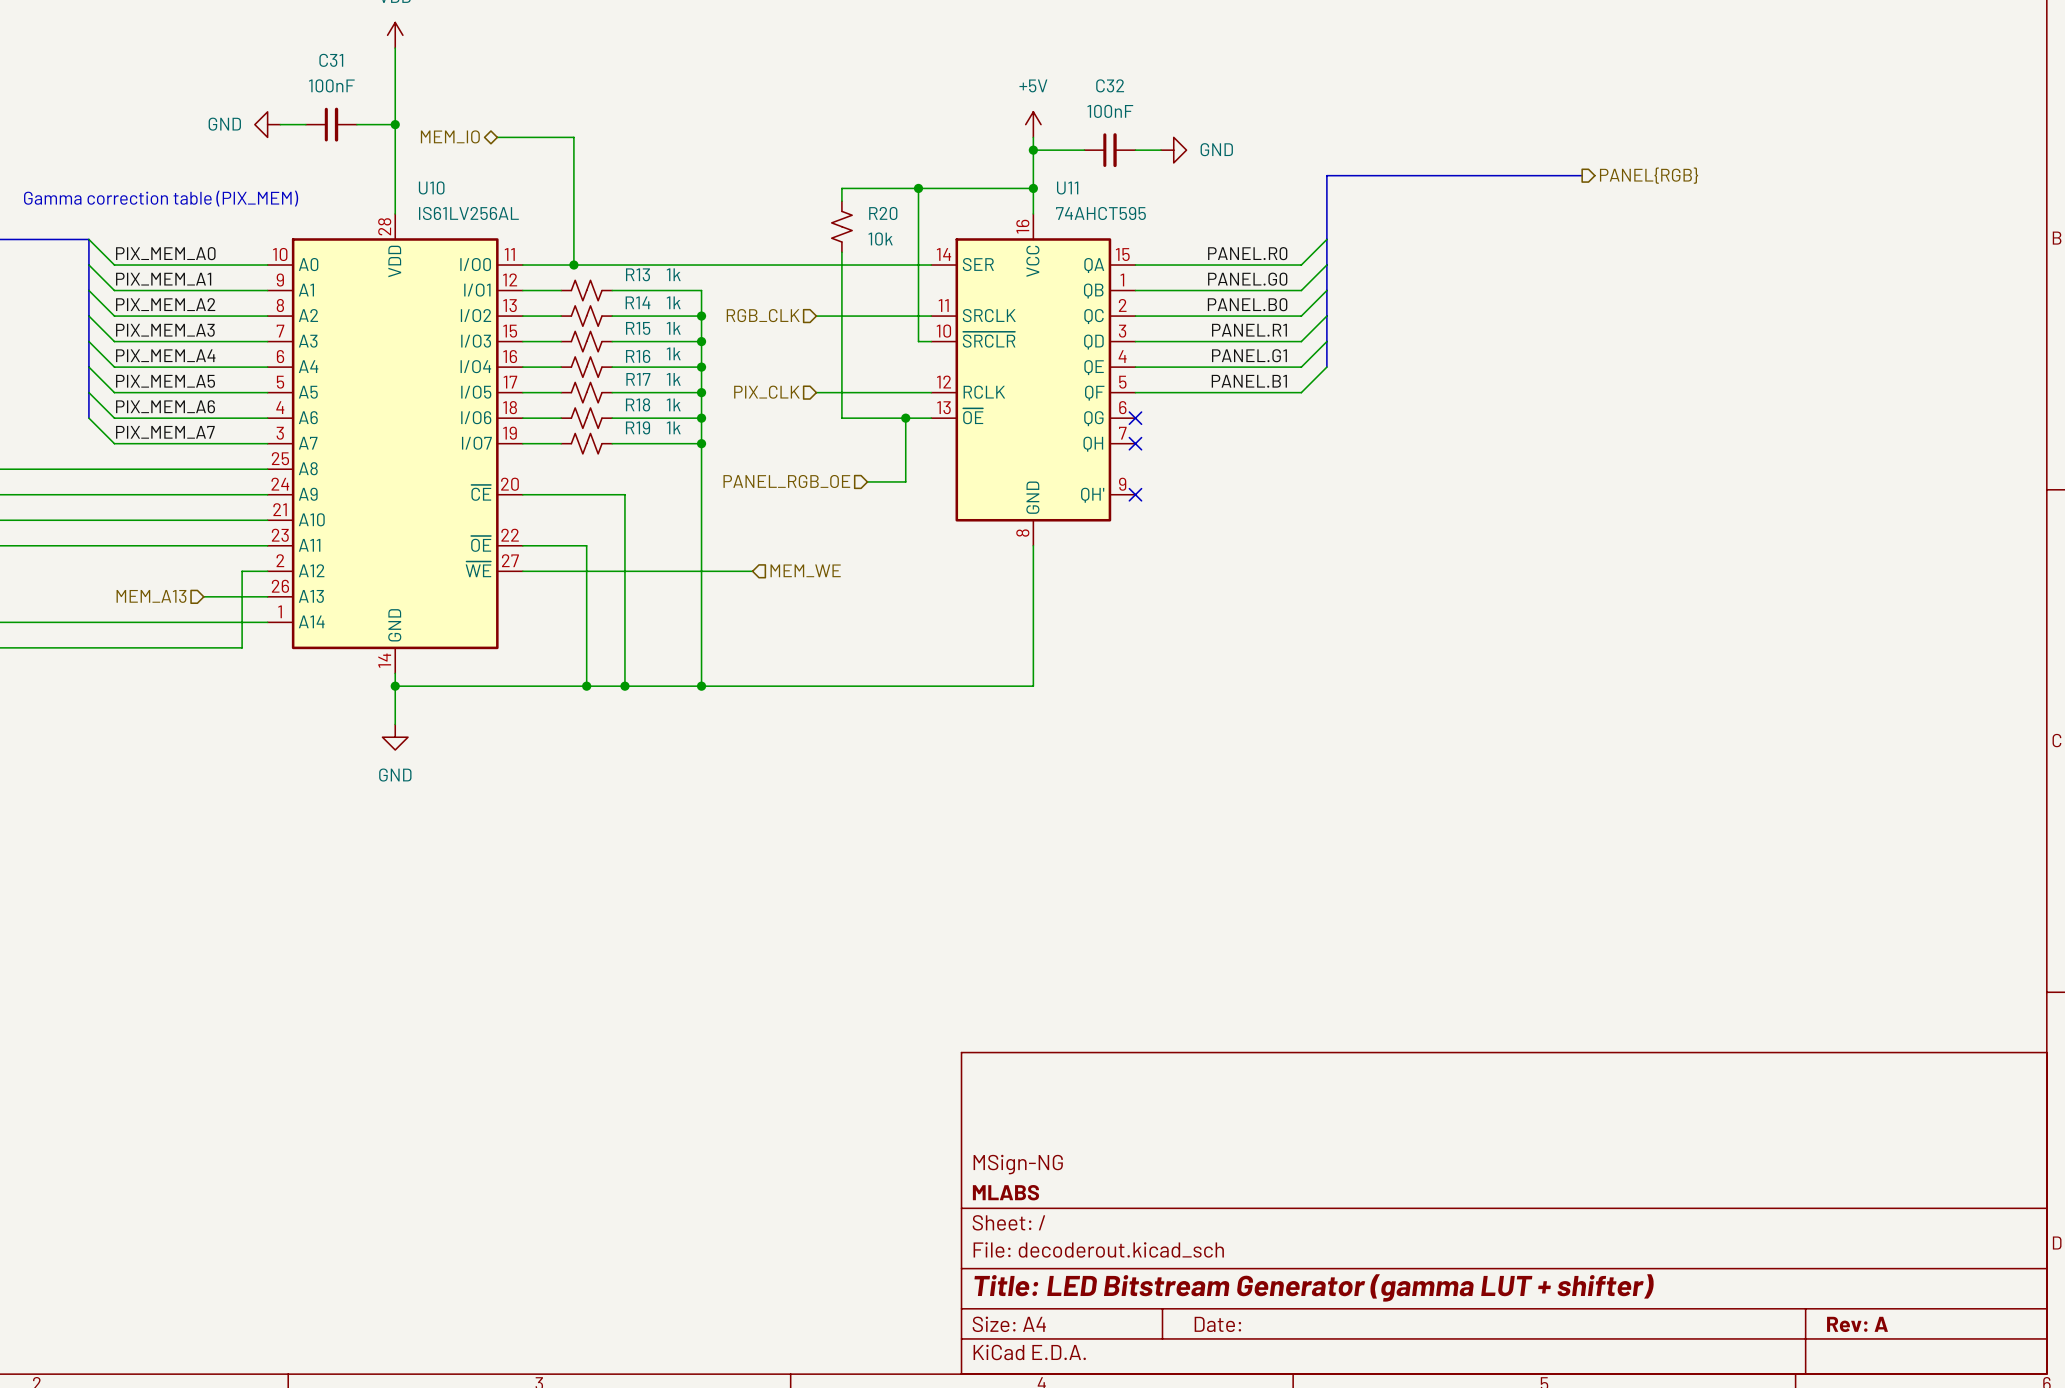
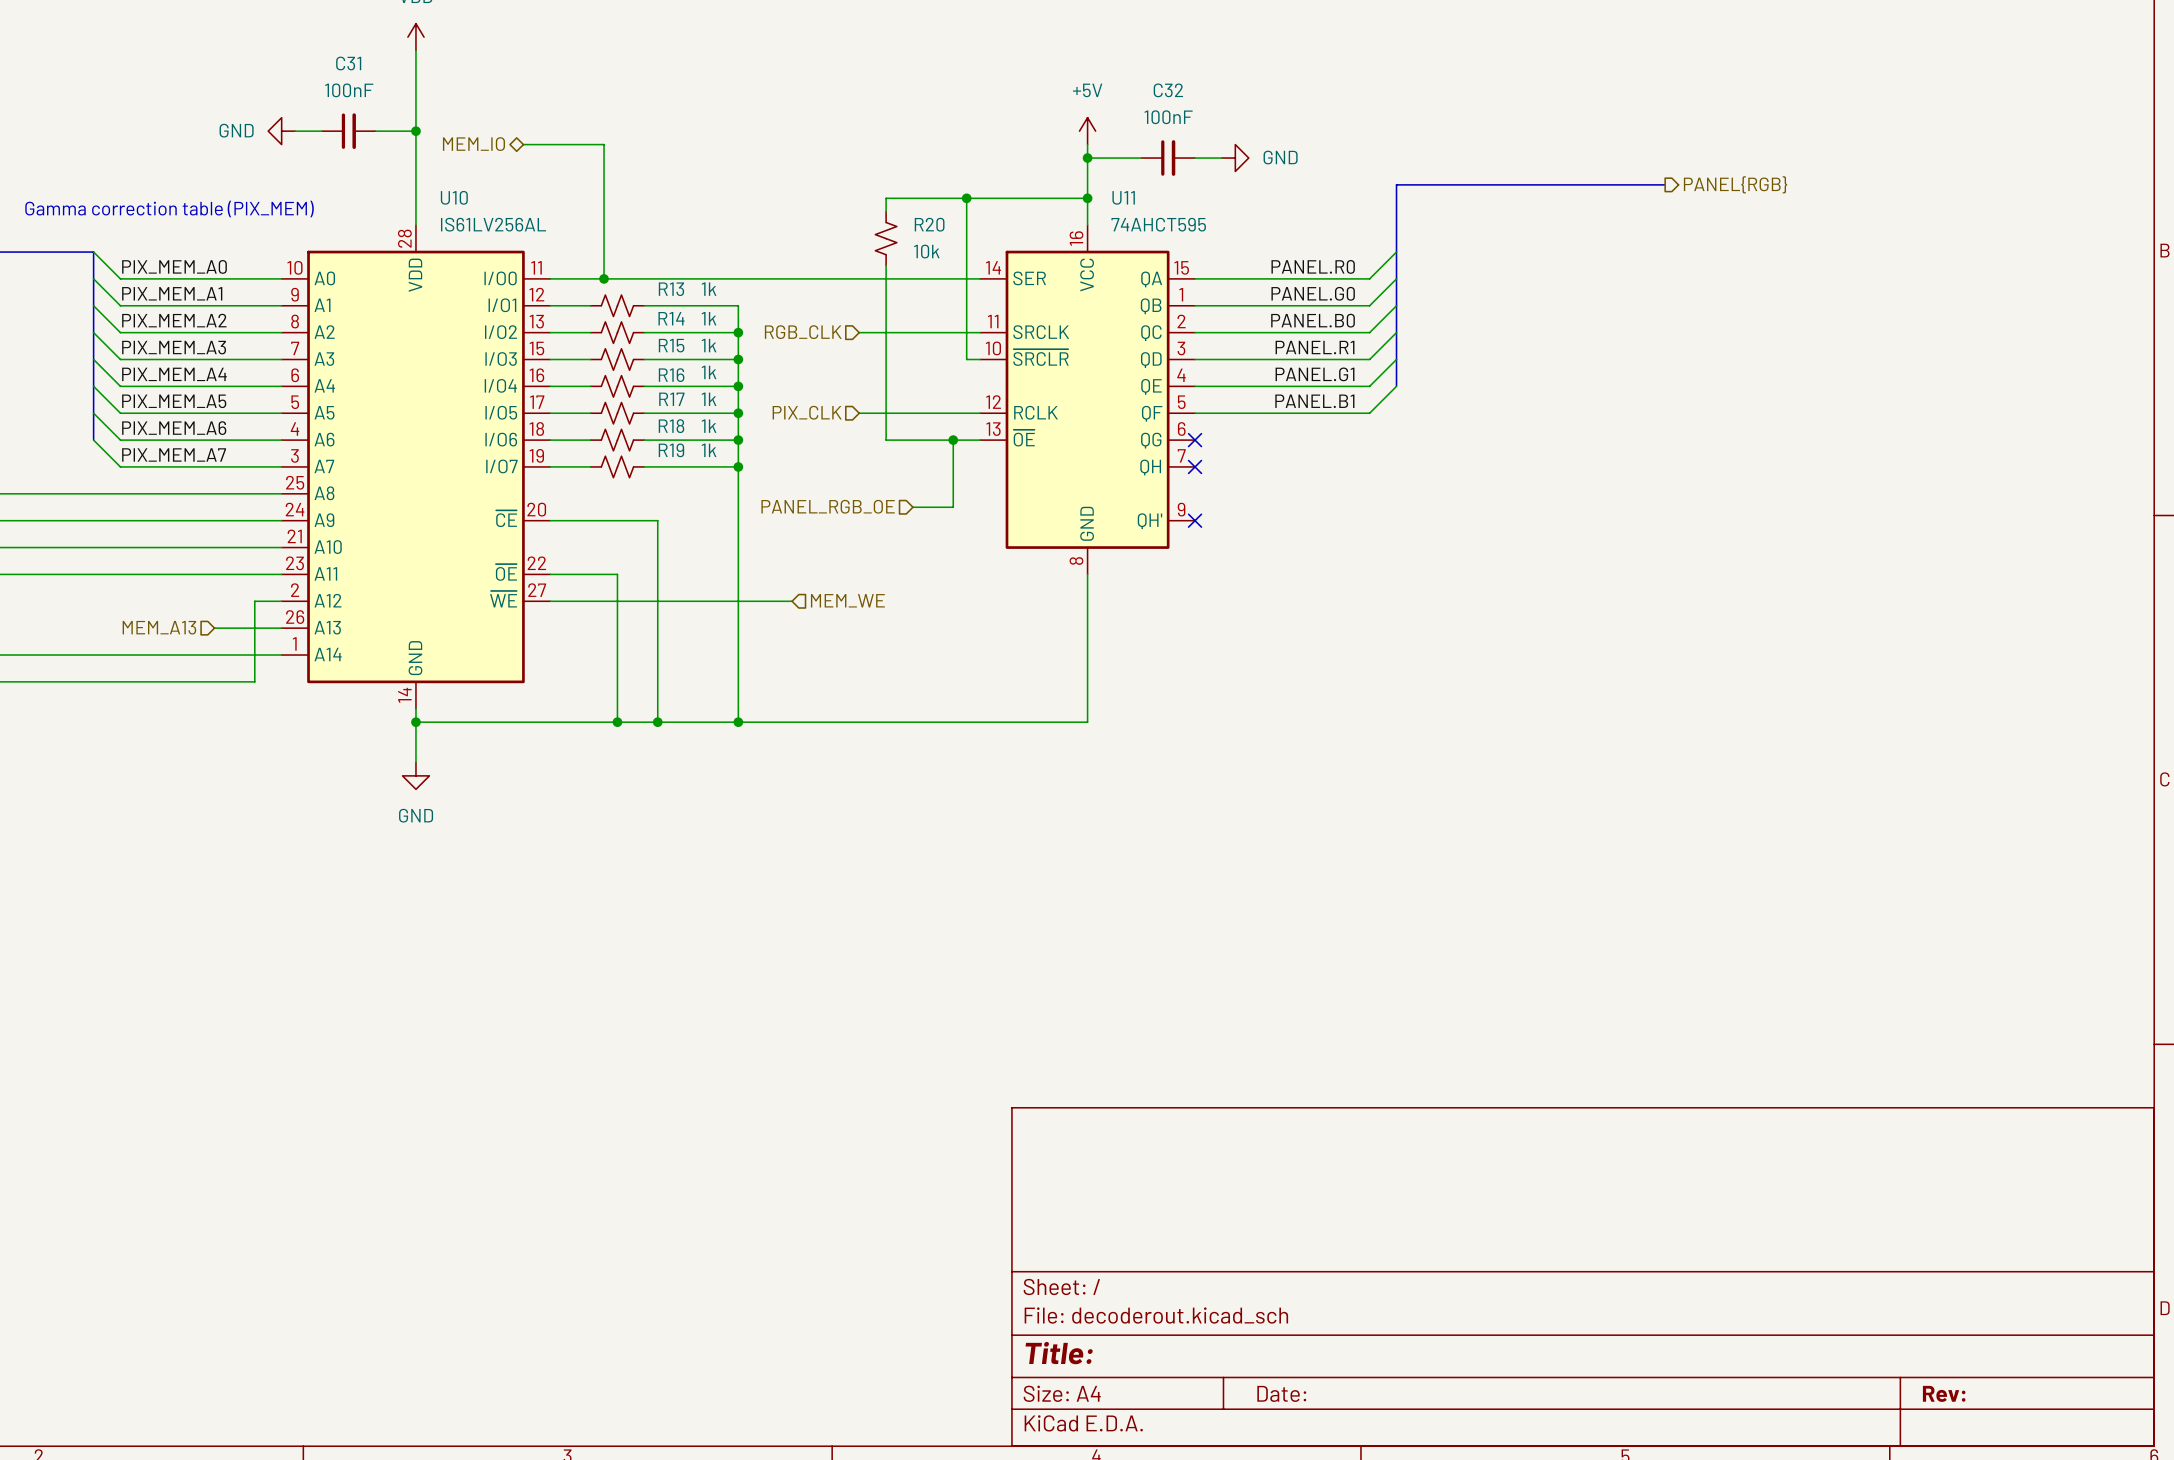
title block: MSign-NG (1018, 1164) -> none
title block: MLABS (1005, 1192) -> none
title block: Title: LED Bitstream Generator (gamma LUT + shifter) (1314, 1287) -> Title: (1059, 1353)
title block: Rev: A (1857, 1324) -> Rev: (1944, 1393)

